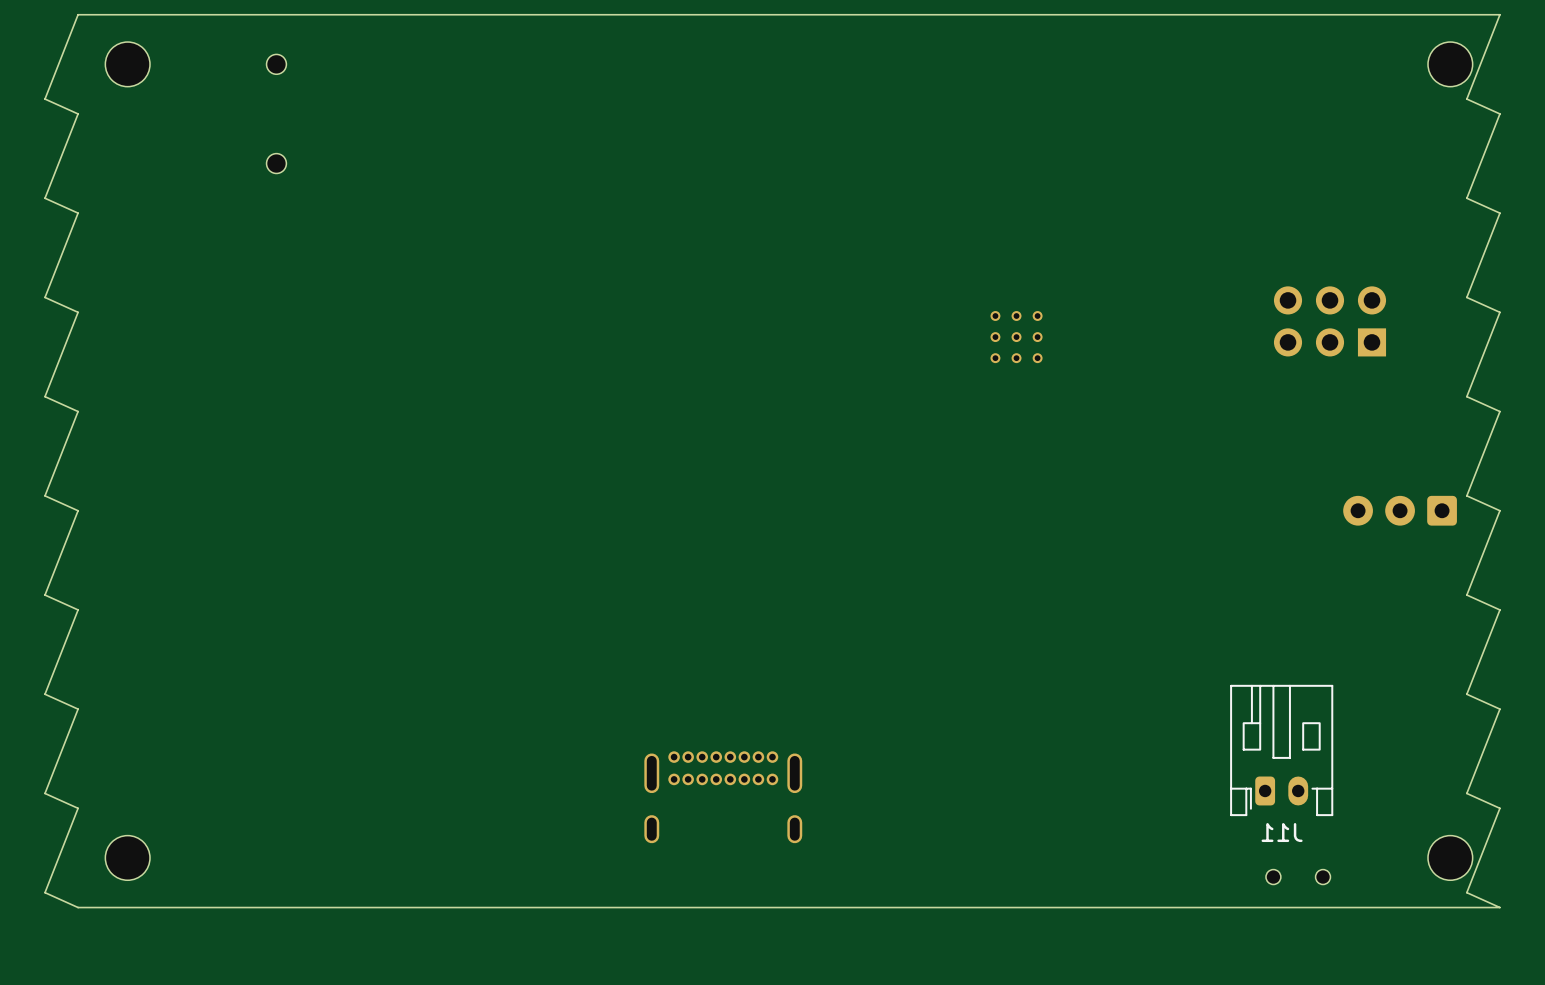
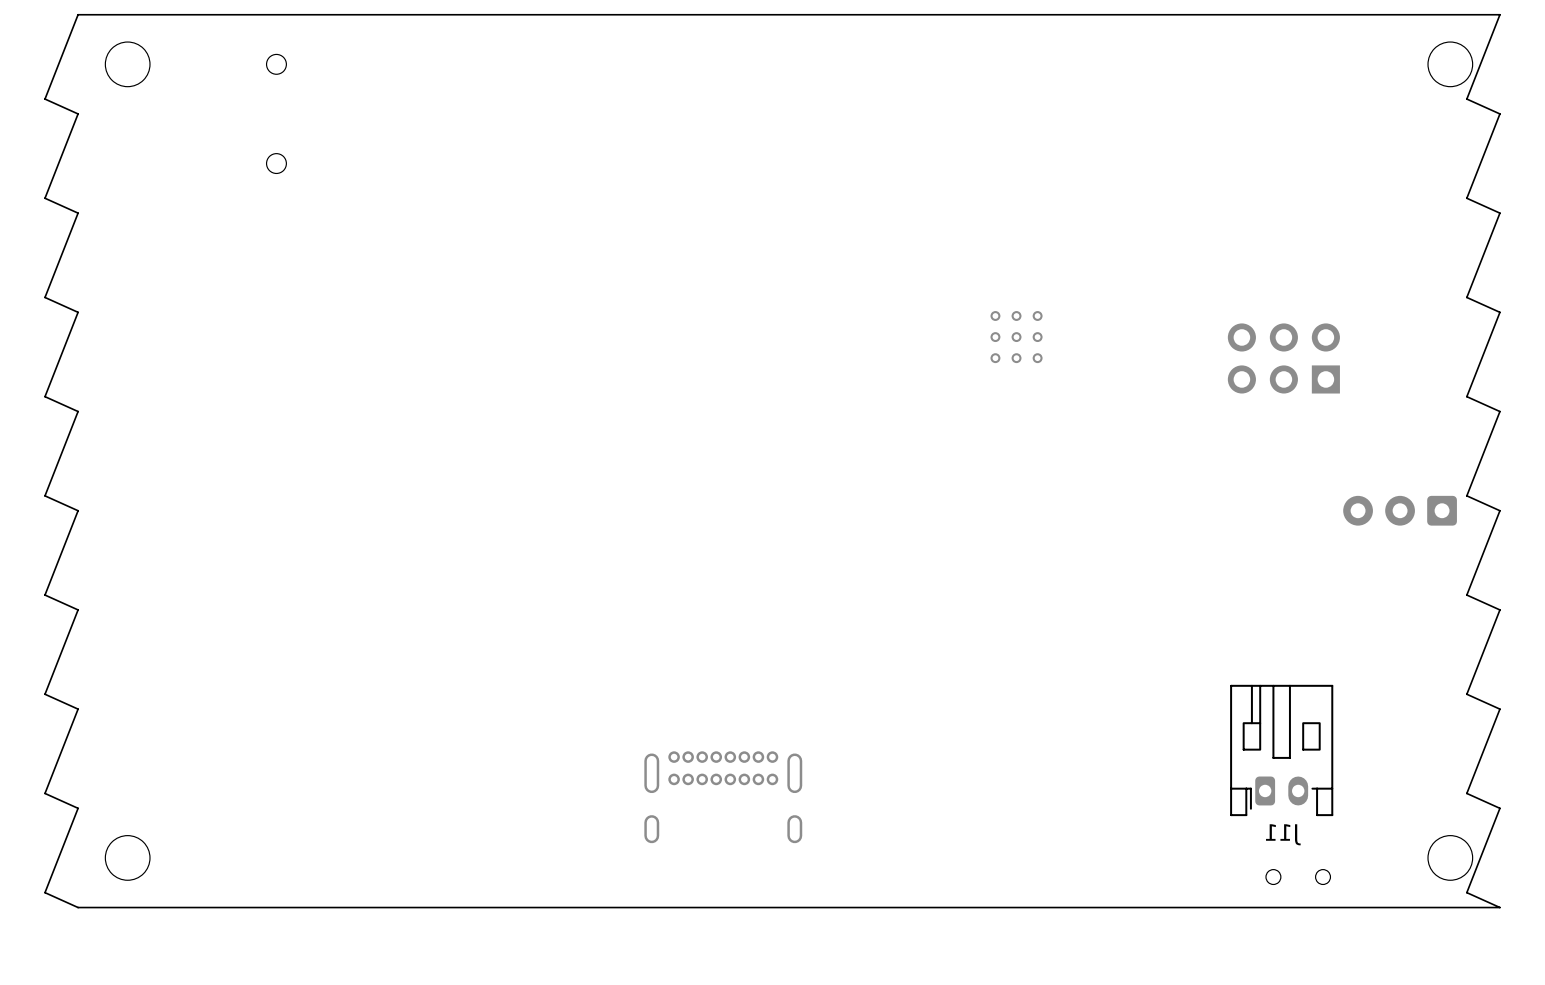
part position: (1330, 321) -> (1283, 358)

